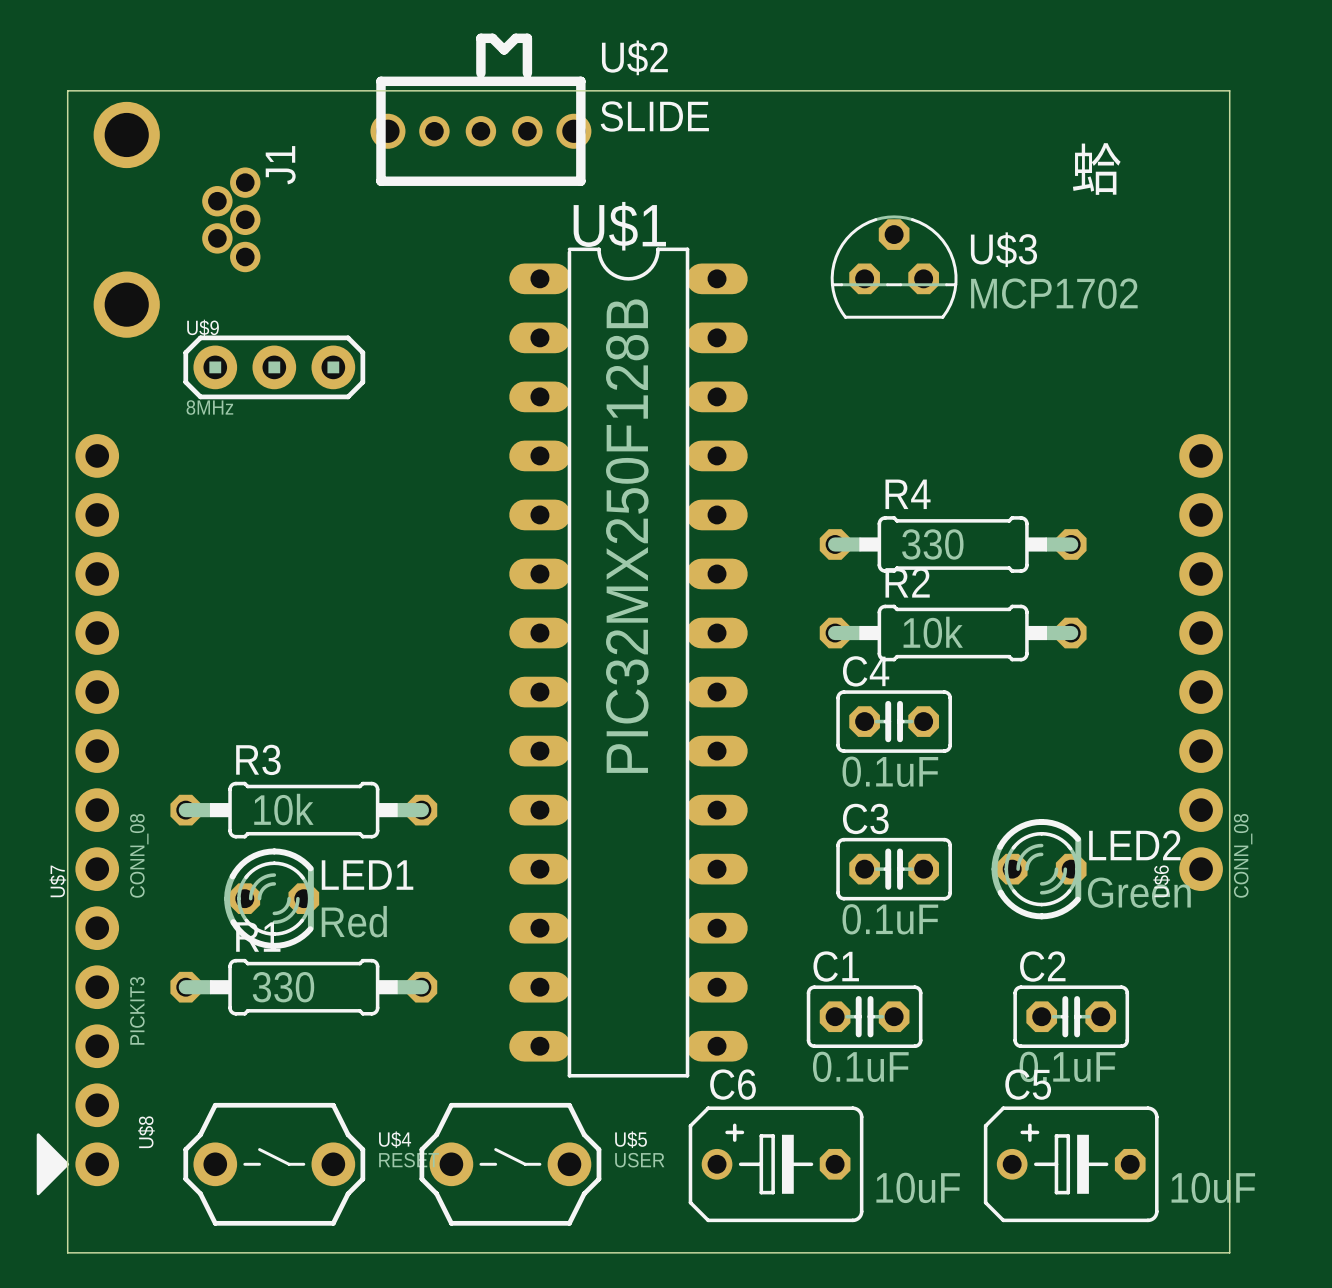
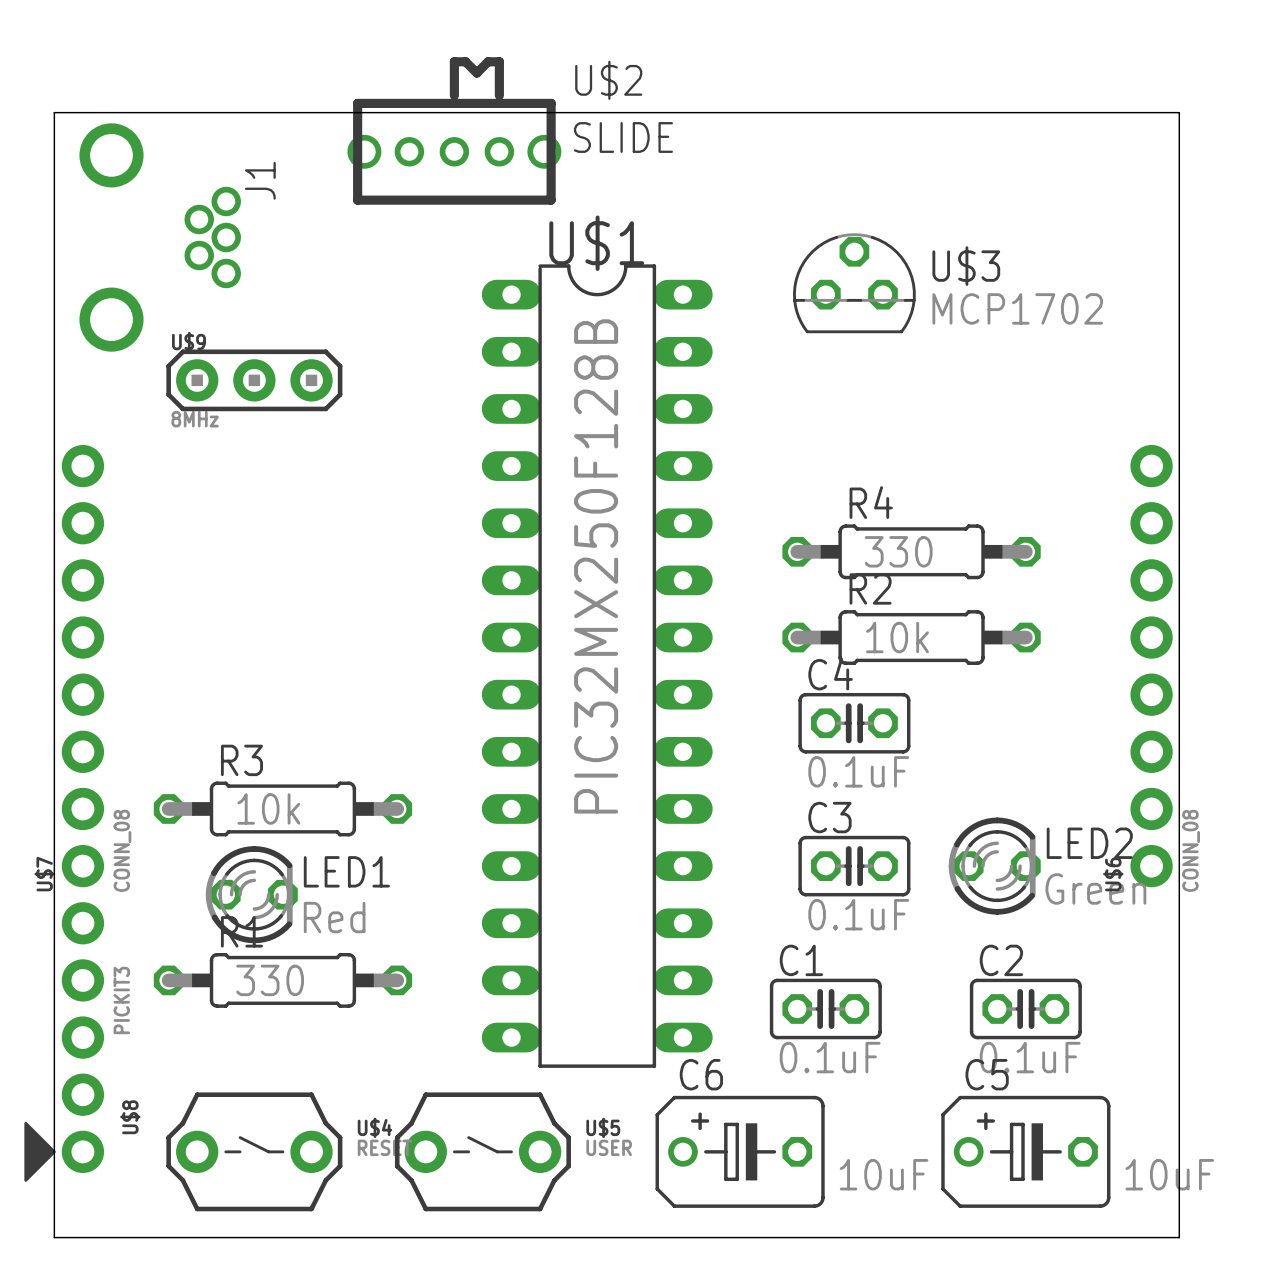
text: 蛤 (1096, 169) -> none

